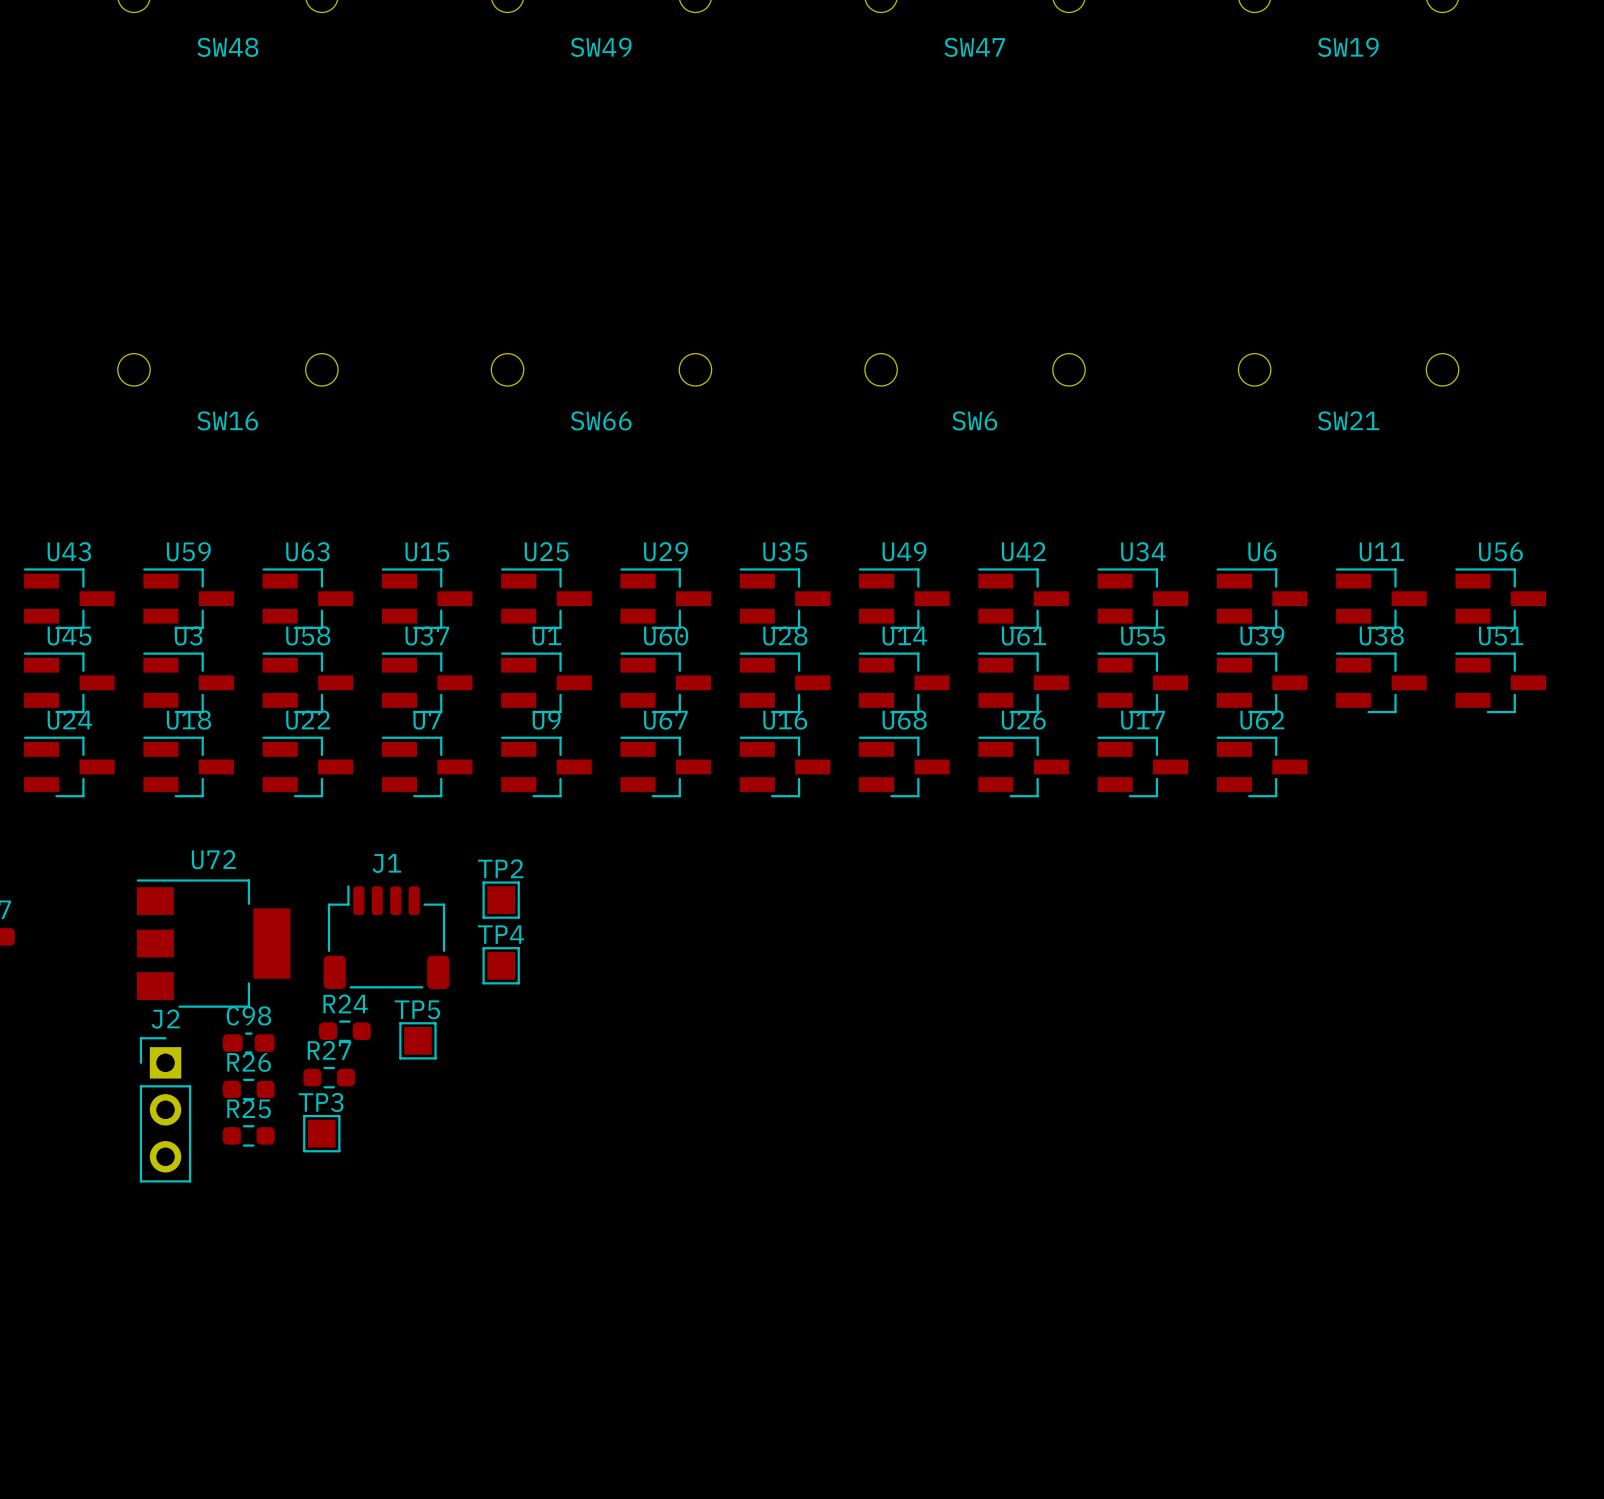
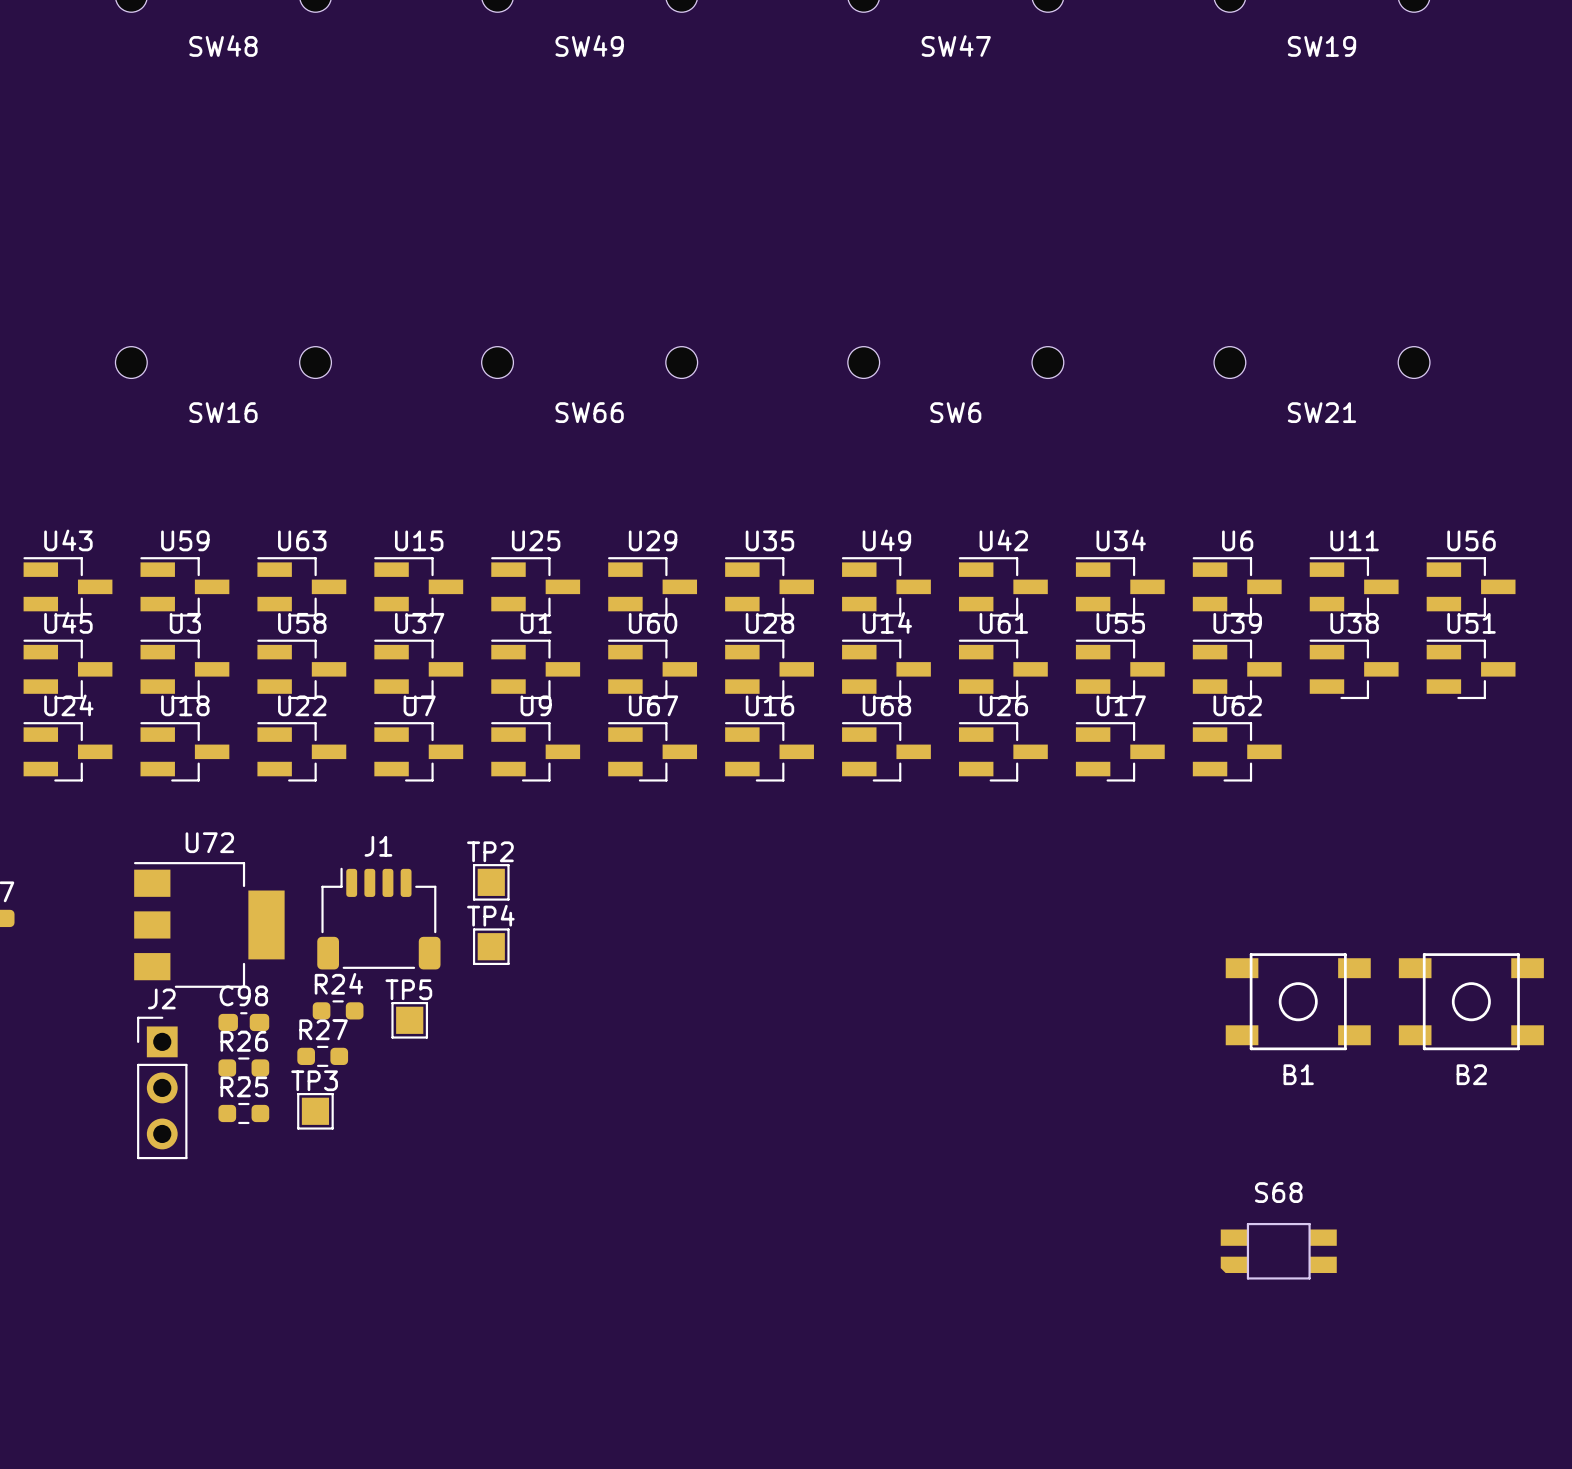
B1: none -> (1298, 1001)
B2: none -> (1471, 1001)
S68: none -> (1278, 1251)

